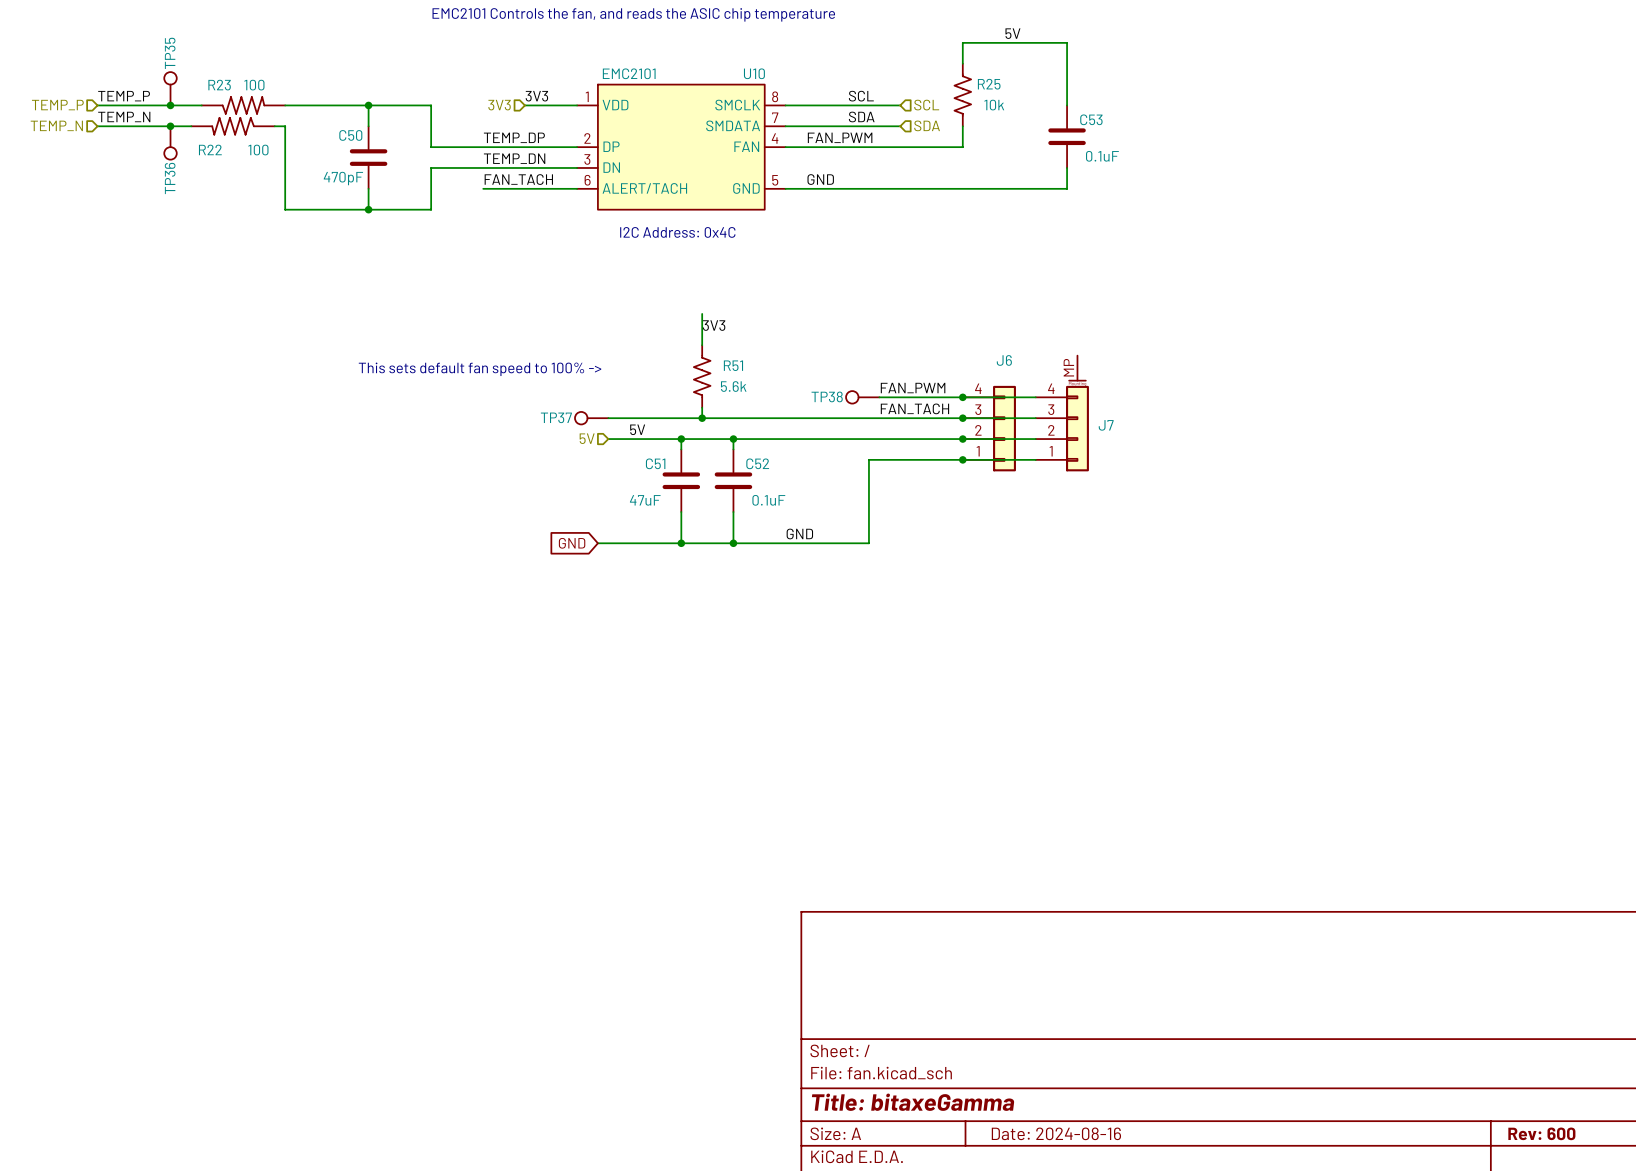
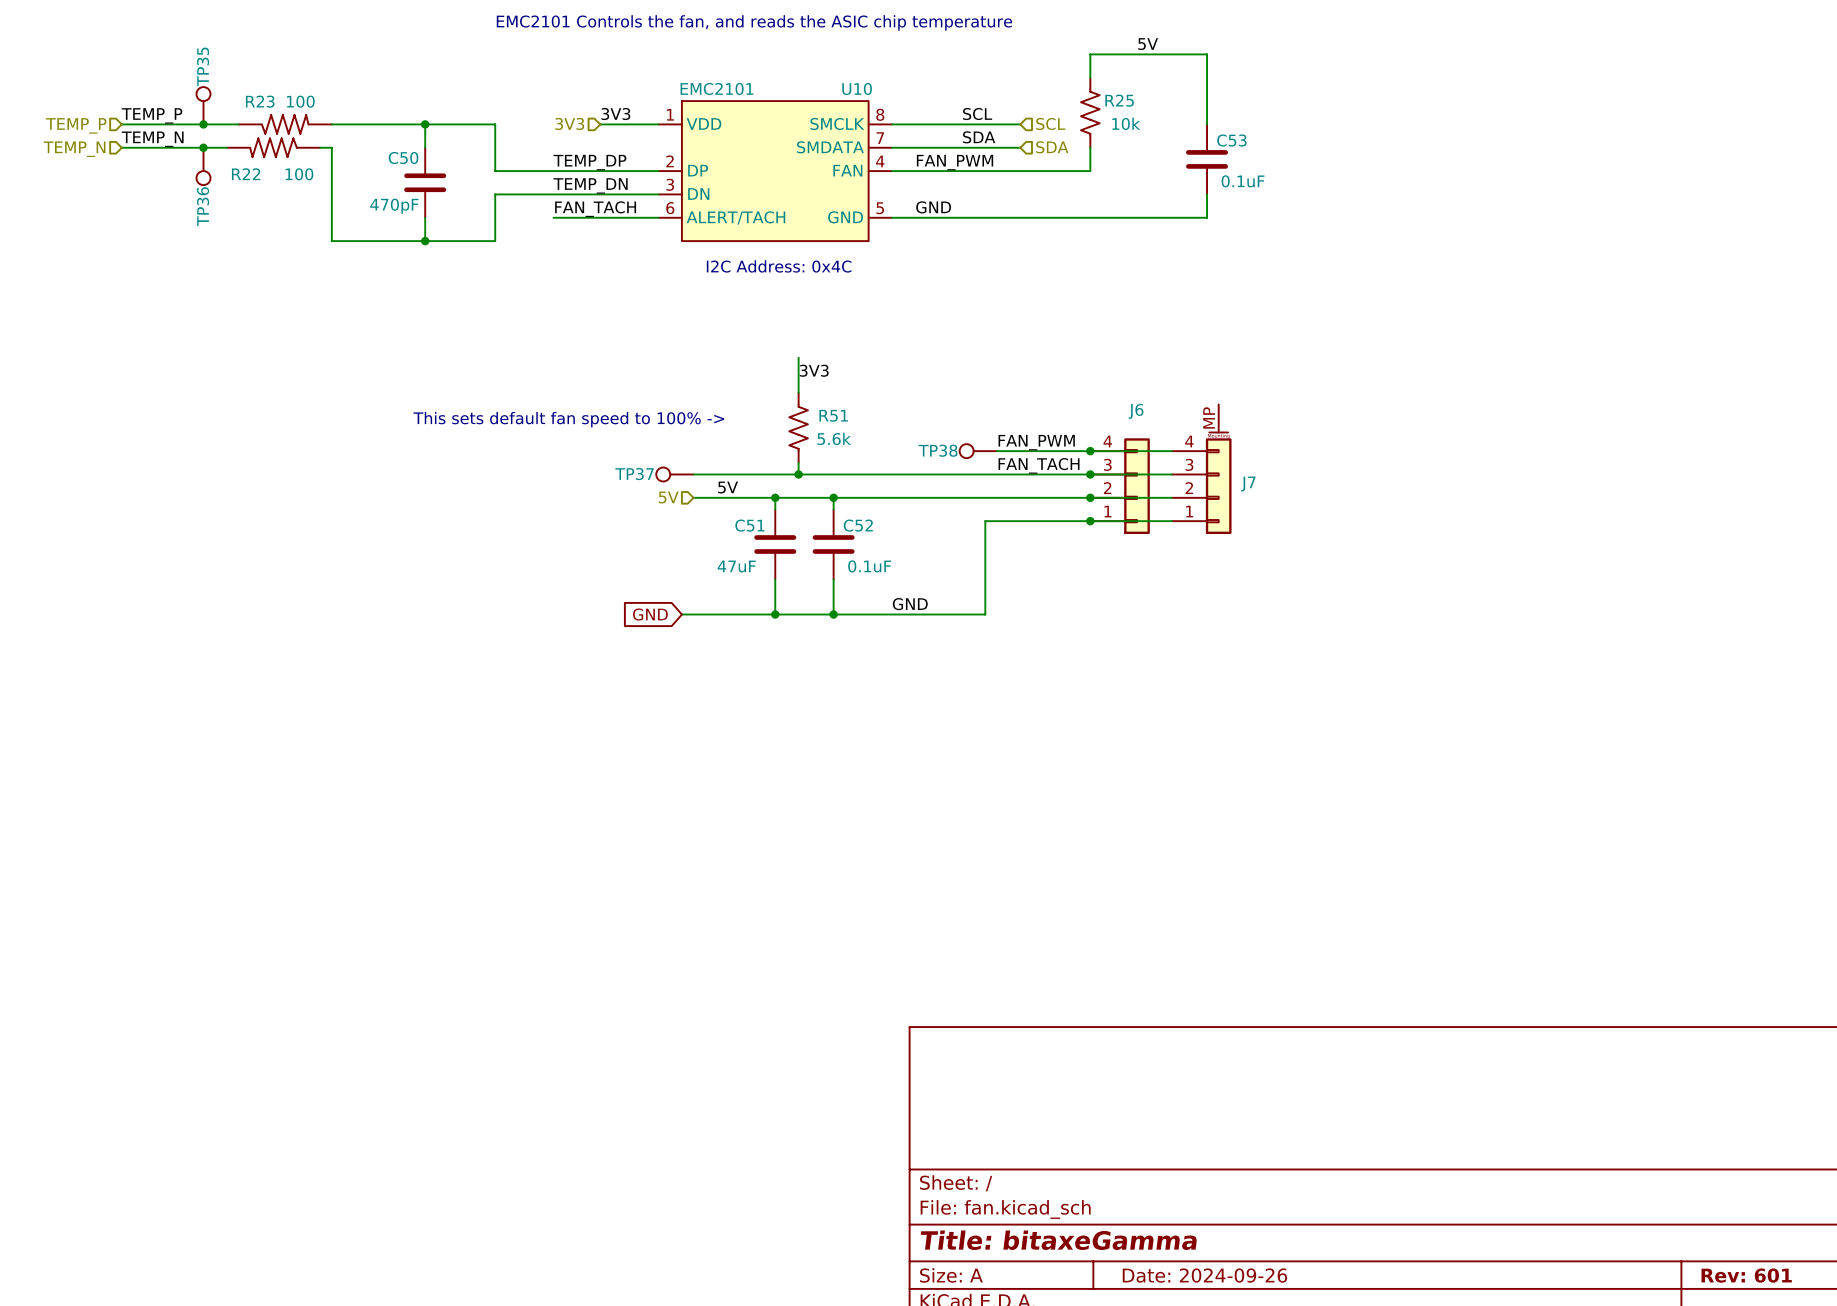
title block: Date: 2024-08-16 (1056, 1133) -> Date: 2024-09-26 (1204, 1275)
title block: Rev: 600 (1541, 1133) -> Rev: 601 (1746, 1275)

